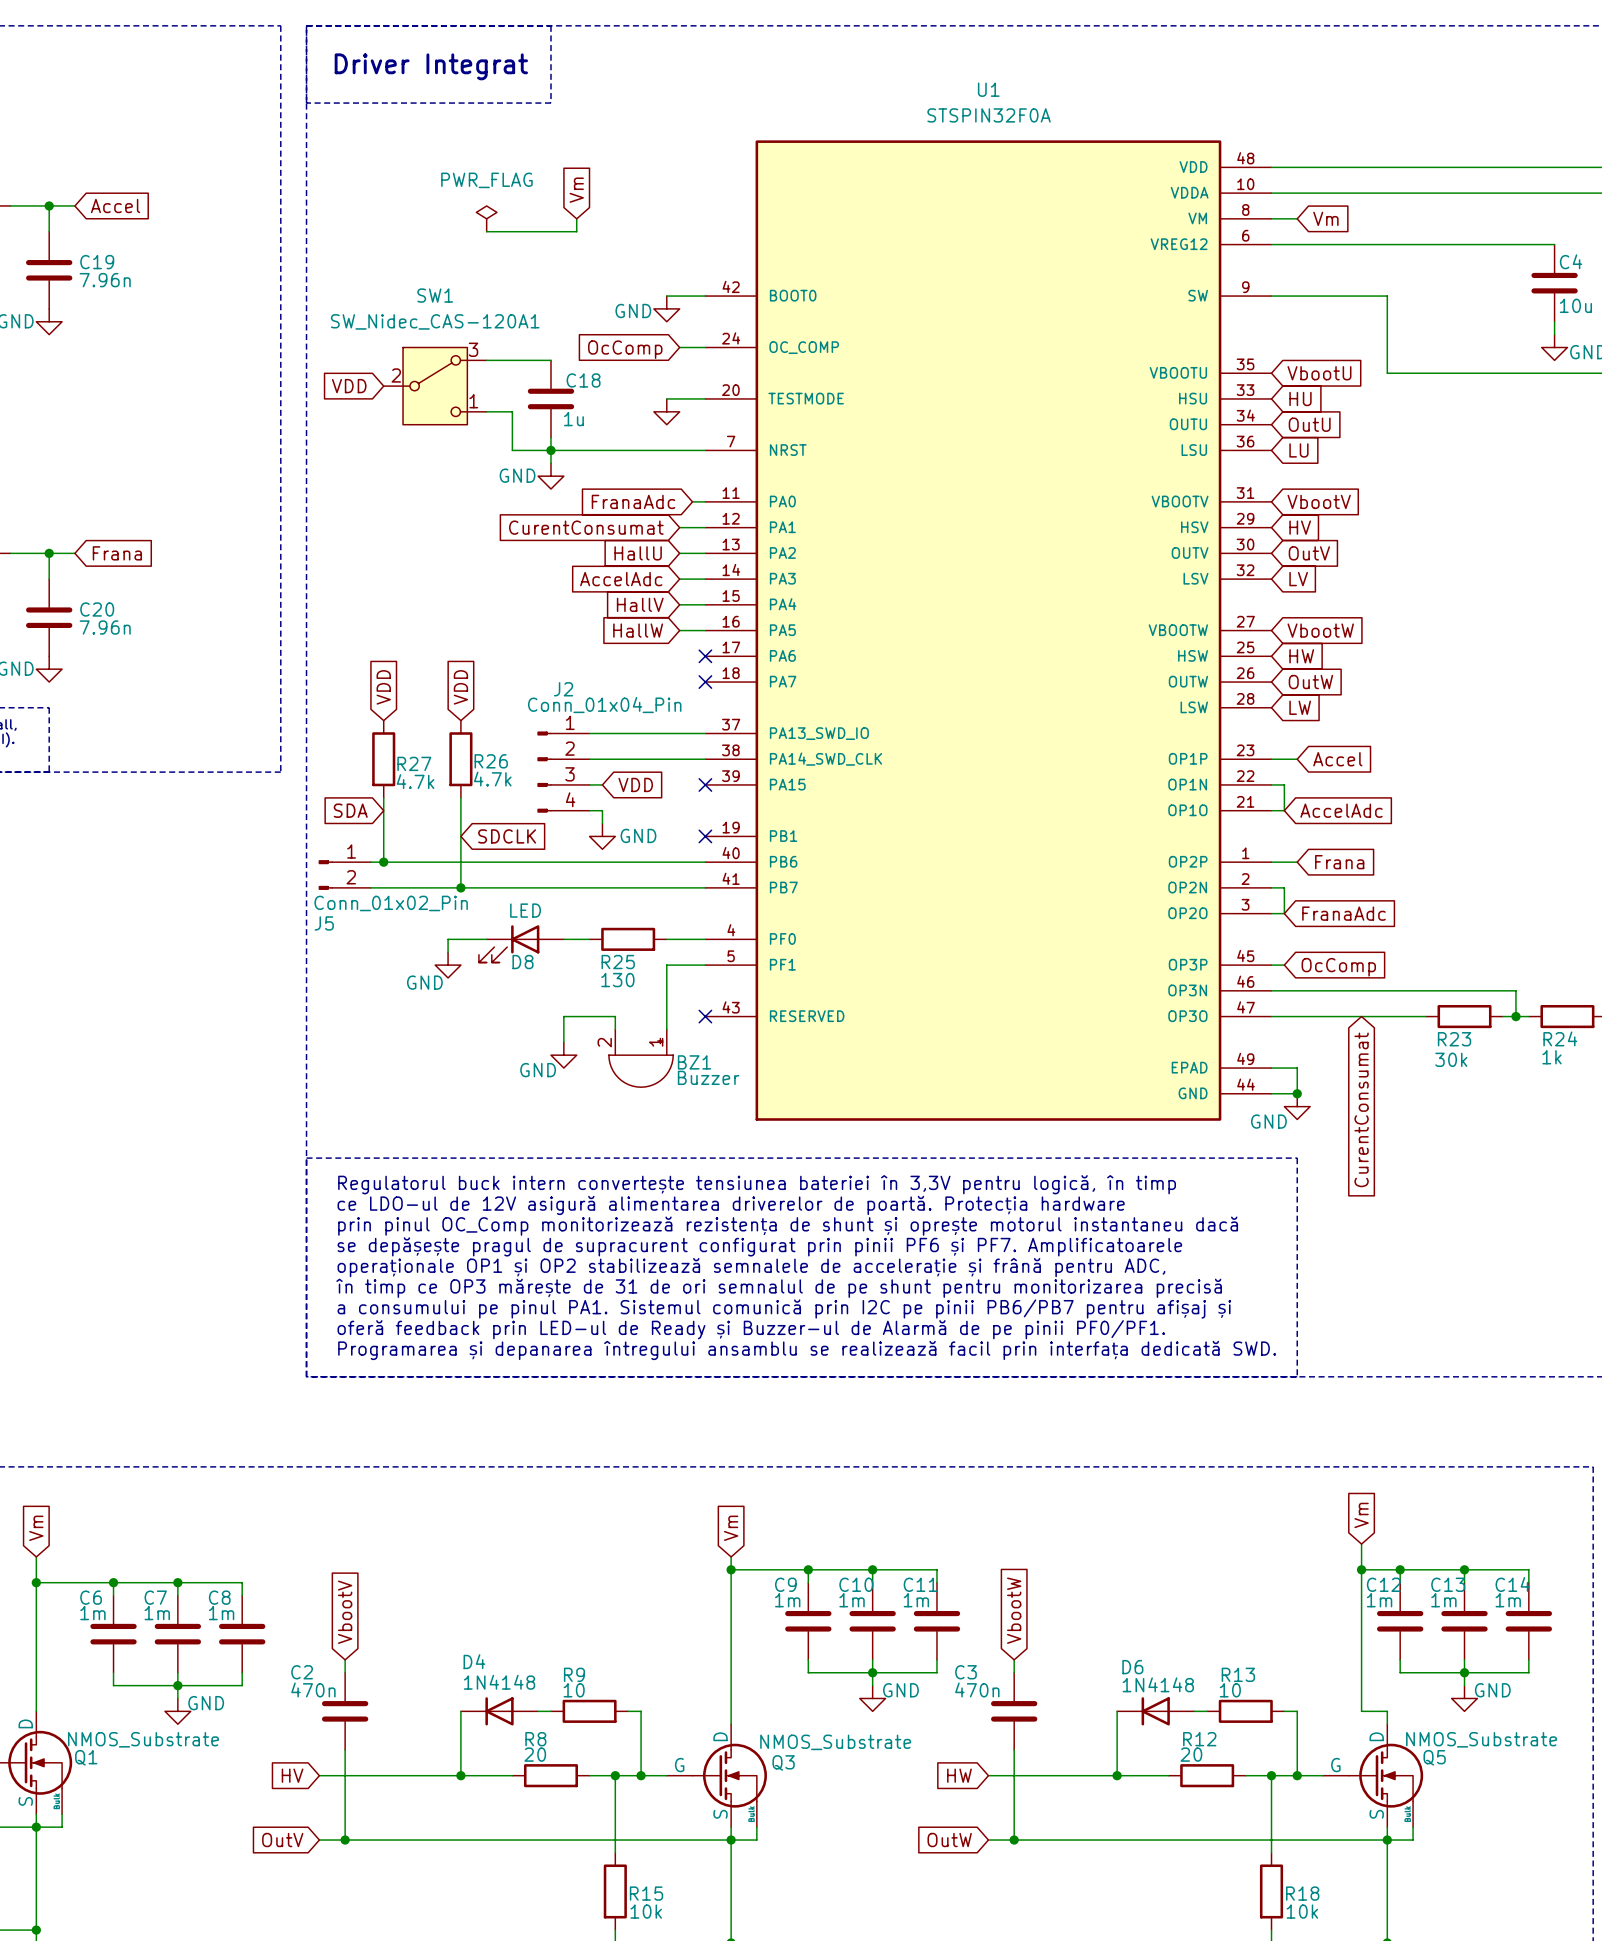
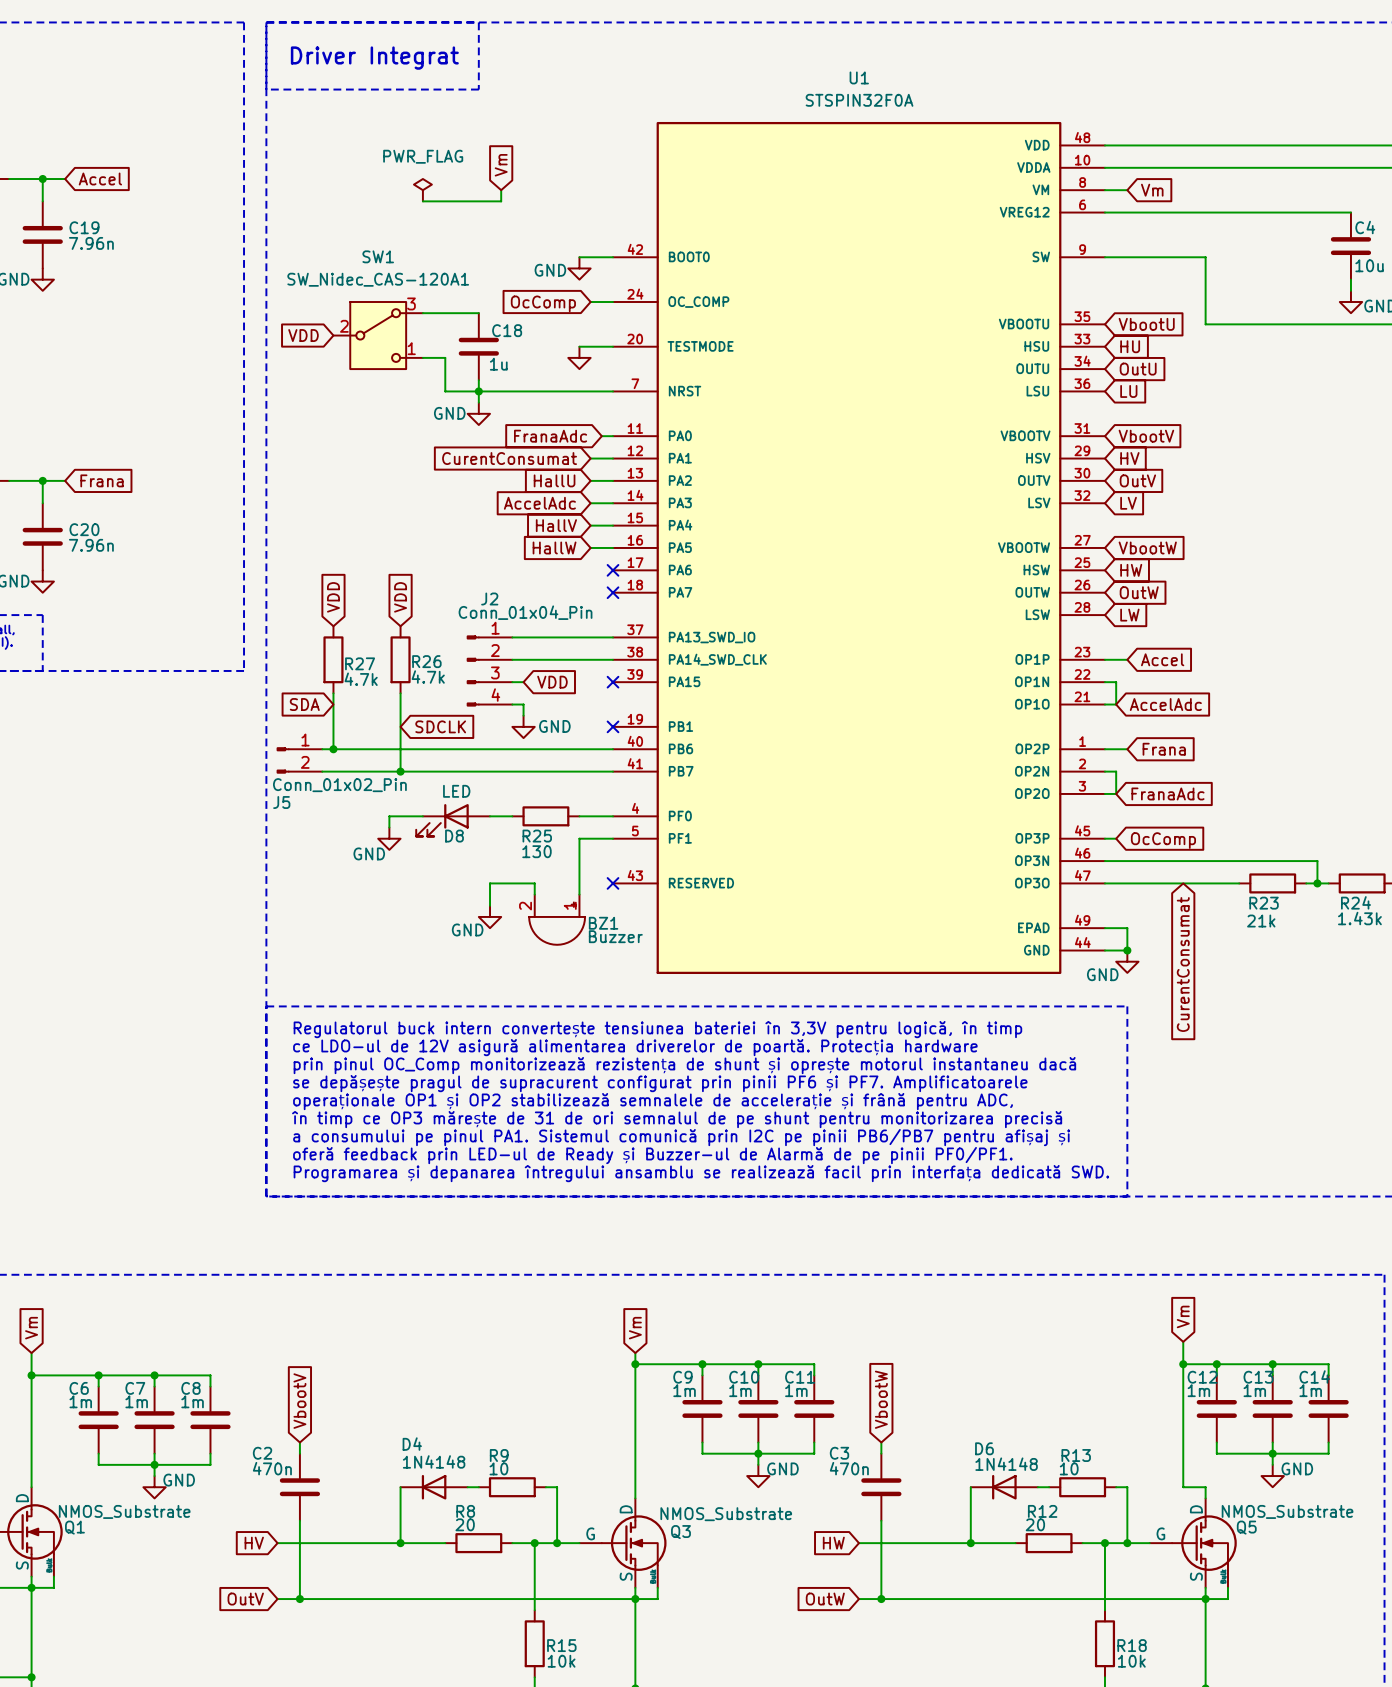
R24 value: 1k (1552, 1057) -> 1.43k (1359, 918)
R23 value: 30k (1451, 1059) -> 21k (1261, 921)

